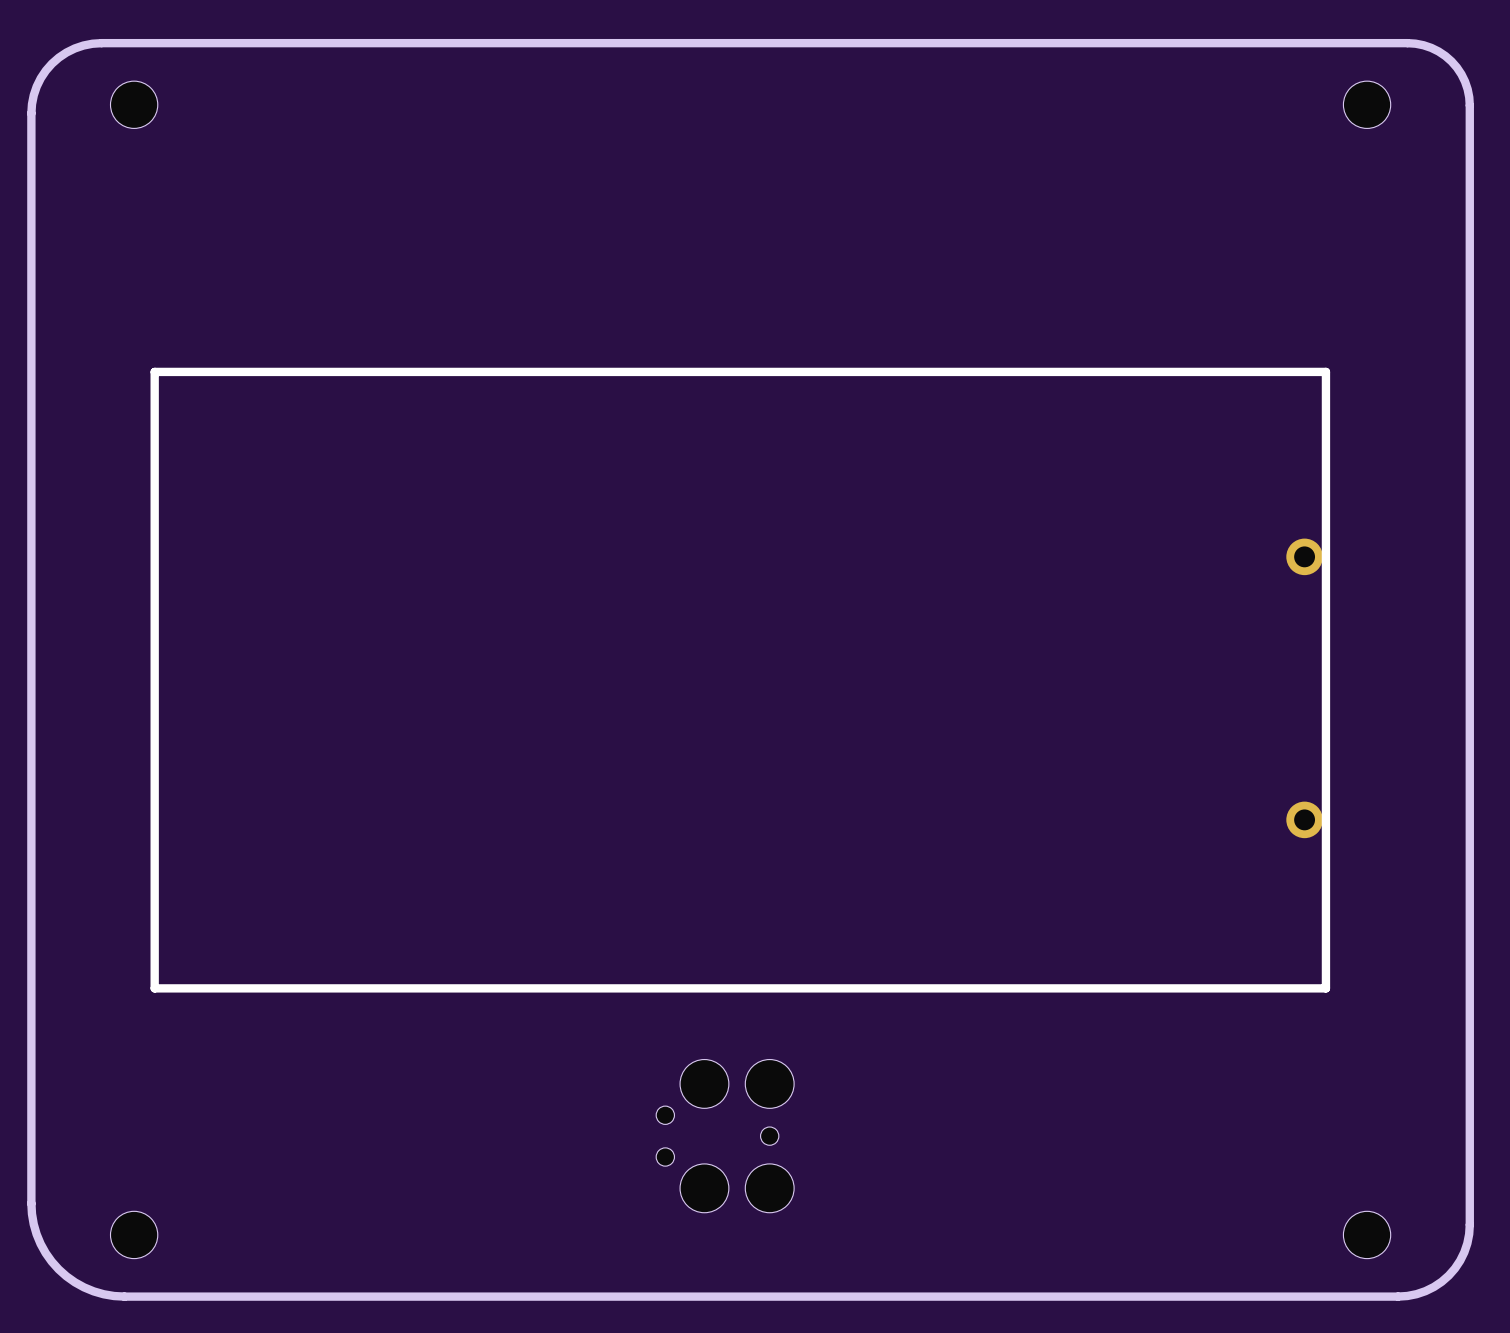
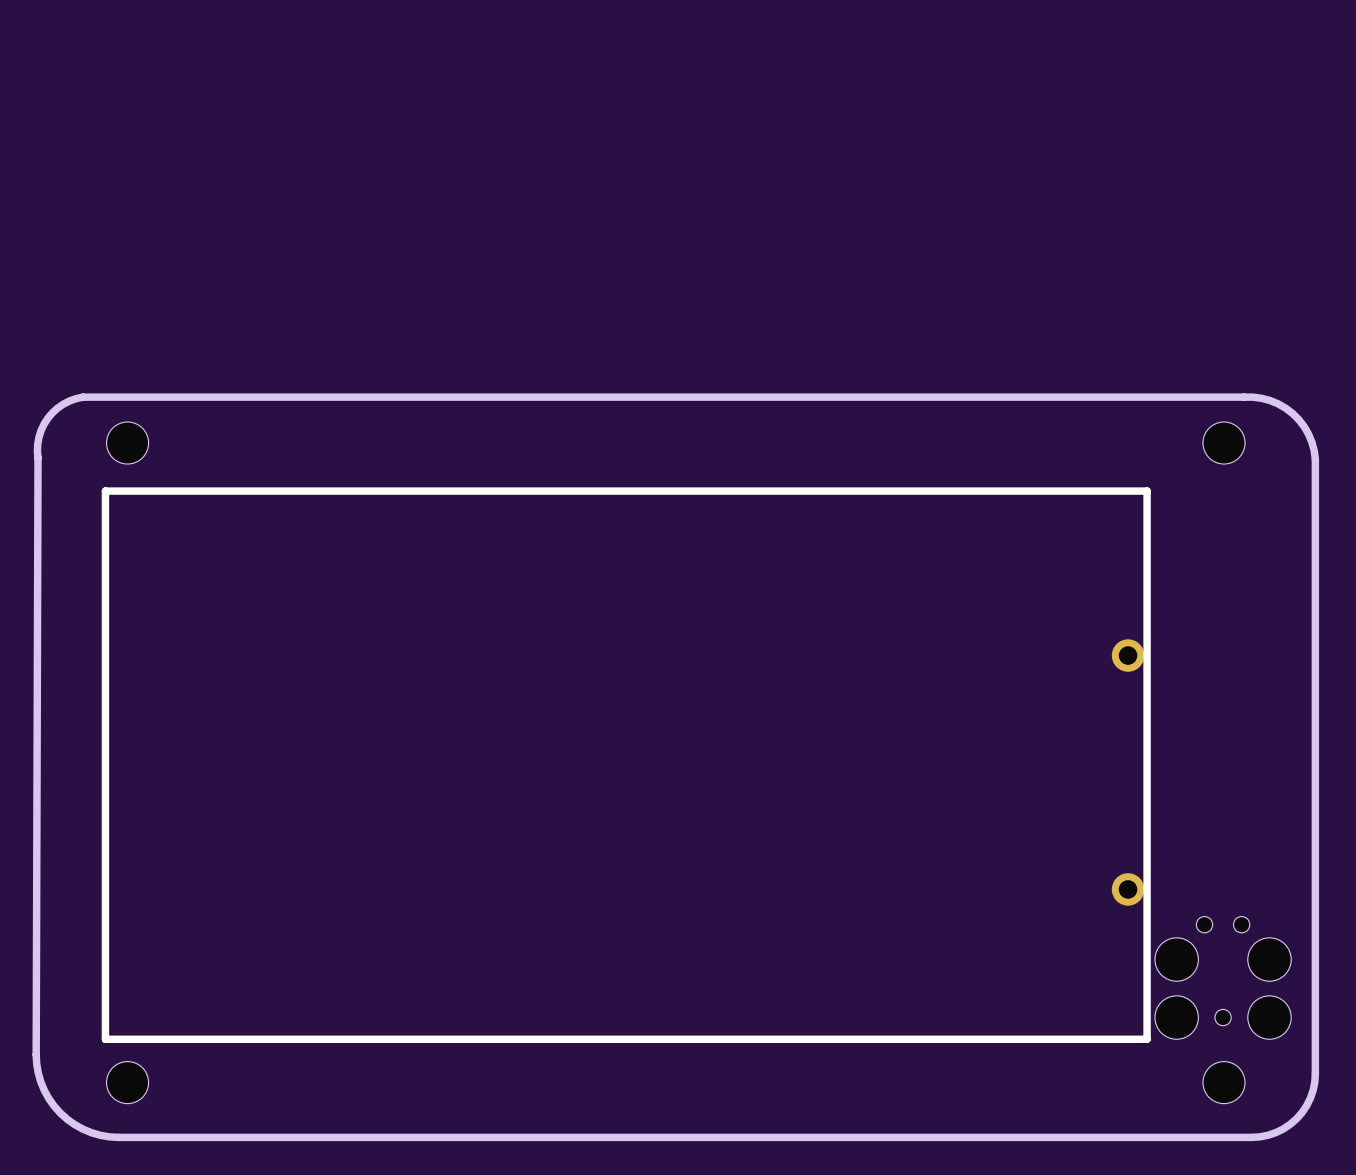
hole position: (134, 104) -> (127, 443)
hole position: (1367, 104) -> (1224, 443)
line: (1325, 371) (154, 371) (154, 988) (1325, 988) (1325, 371) -> (1147, 491) (105, 491) (105, 1039) (1147, 1039) (1147, 491)
board edge: (1469, 534) (1469, 97) (1465, 81) (1456, 67) (1445, 56) (1431, 47) (1407, 43) (101, 43) (74, 48) (51, 63) (40, 78) (33, 95) (31, 113) (31, 1203) -> (1315, 459) (1308, 434) (1292, 413) (1270, 400) (1252, 397) (82, 397) (69, 401) (57, 408) (47, 418) (41, 430) (37, 444) (36, 1054)
part: (1304, 556) -> none
part position: (1304, 819) -> (1128, 655)
part: none -> (1128, 889)
part: none -> (1223, 977)
part: (725, 1136) -> none

